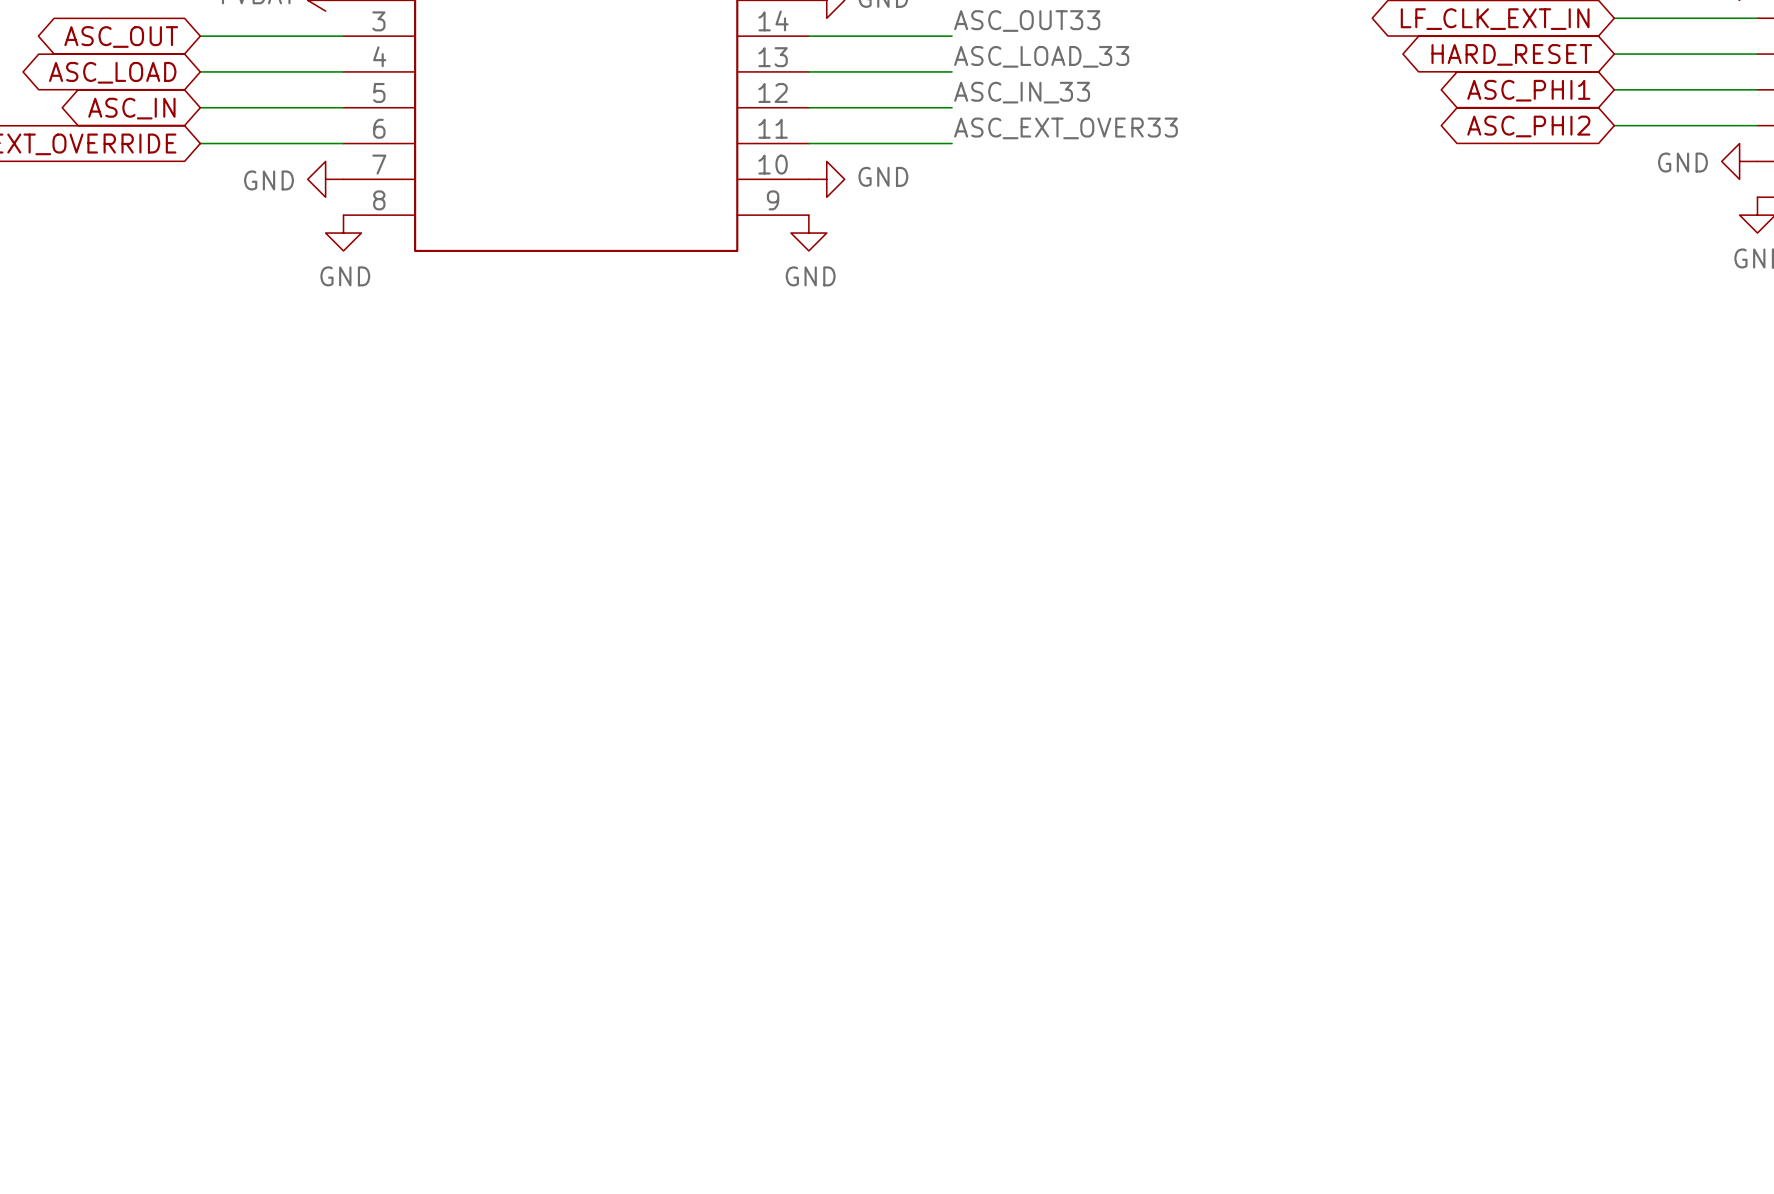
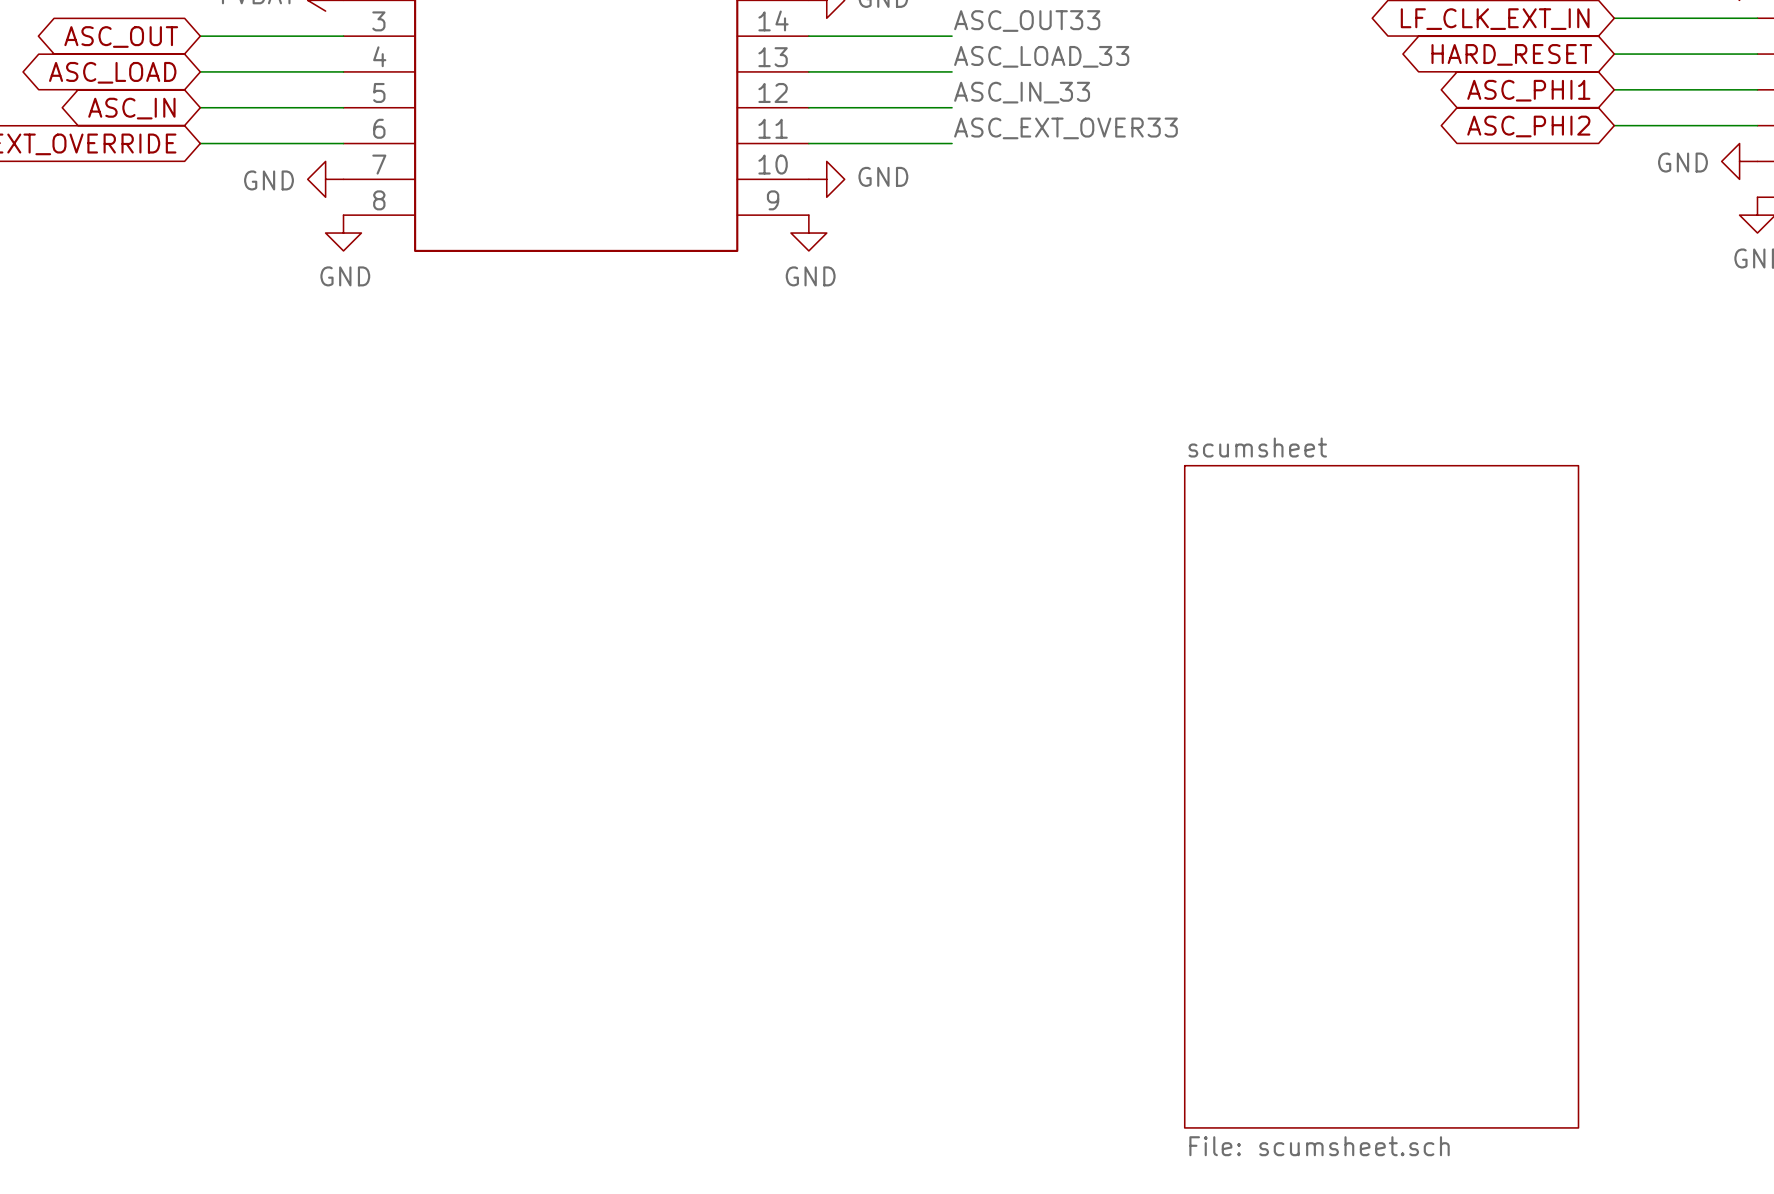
sheet scumsheet: none -> File: scumsheet.sch (1381, 796)

